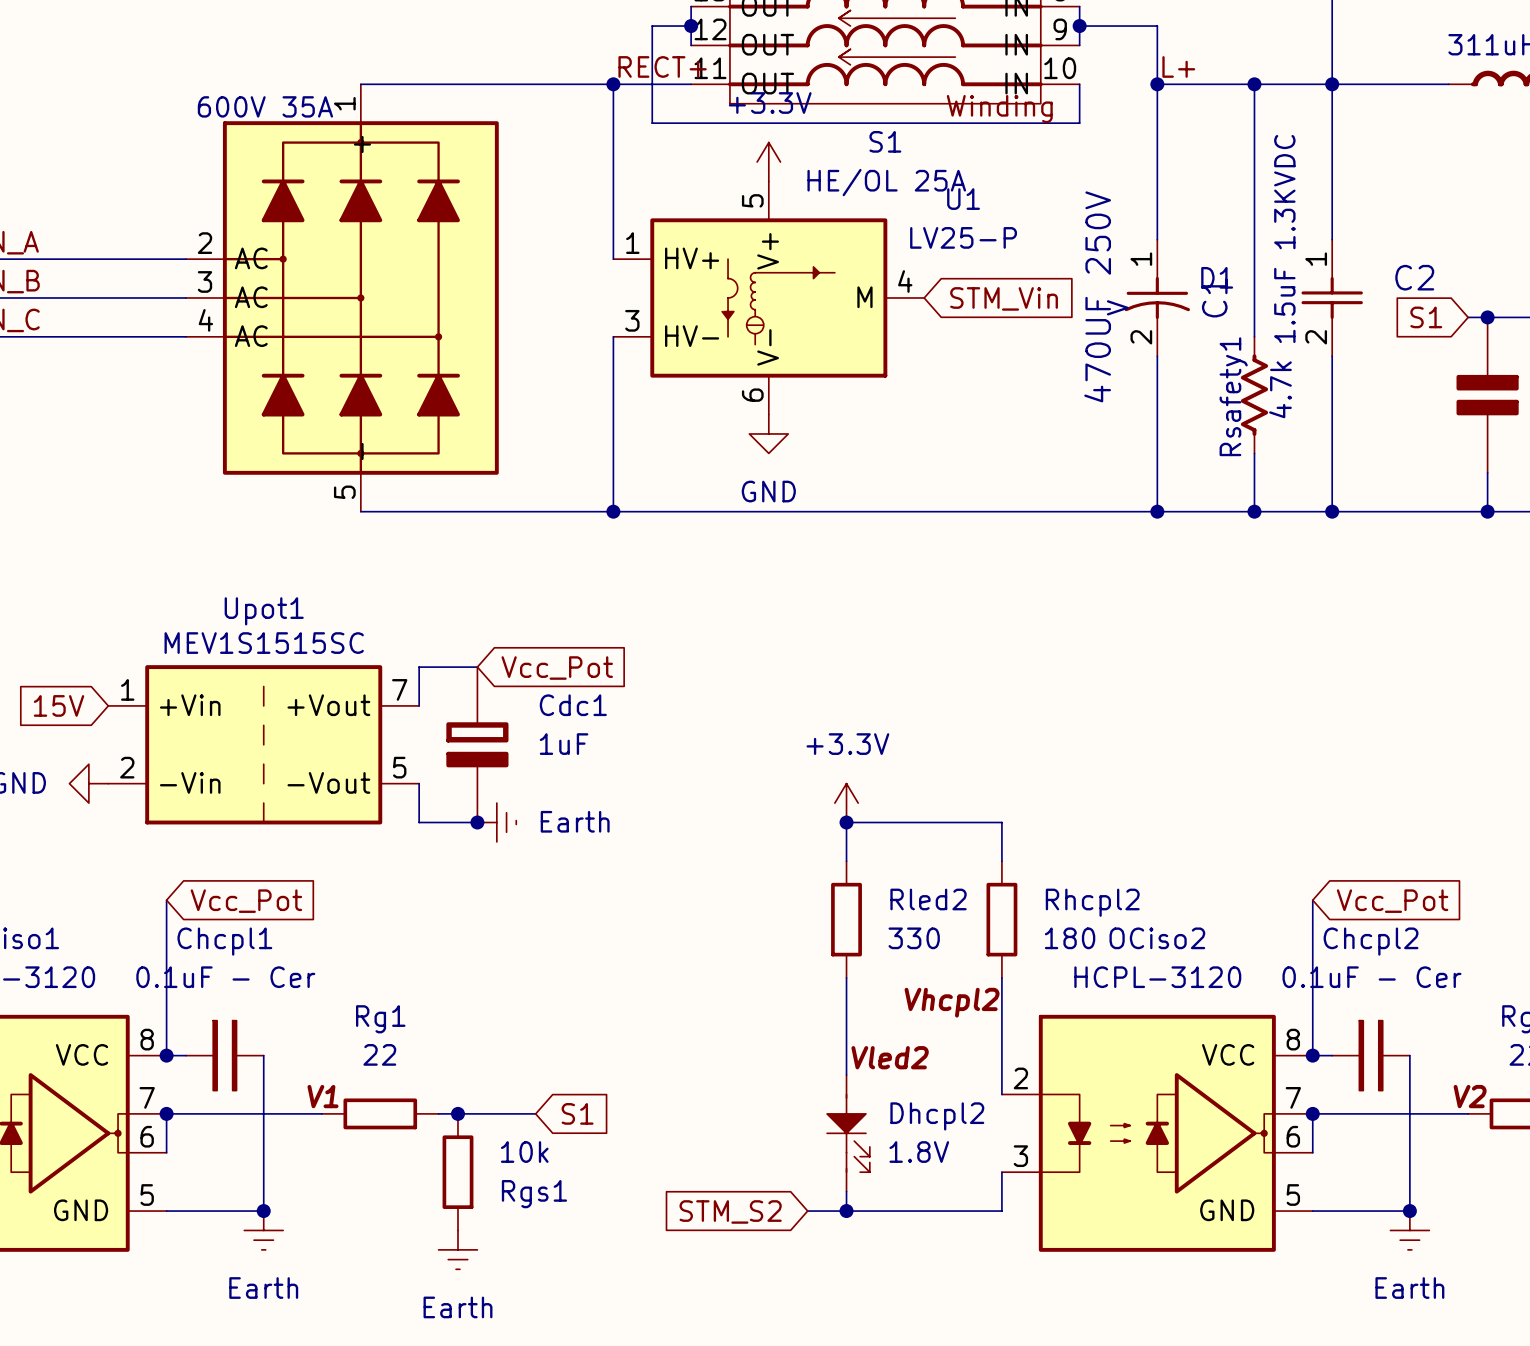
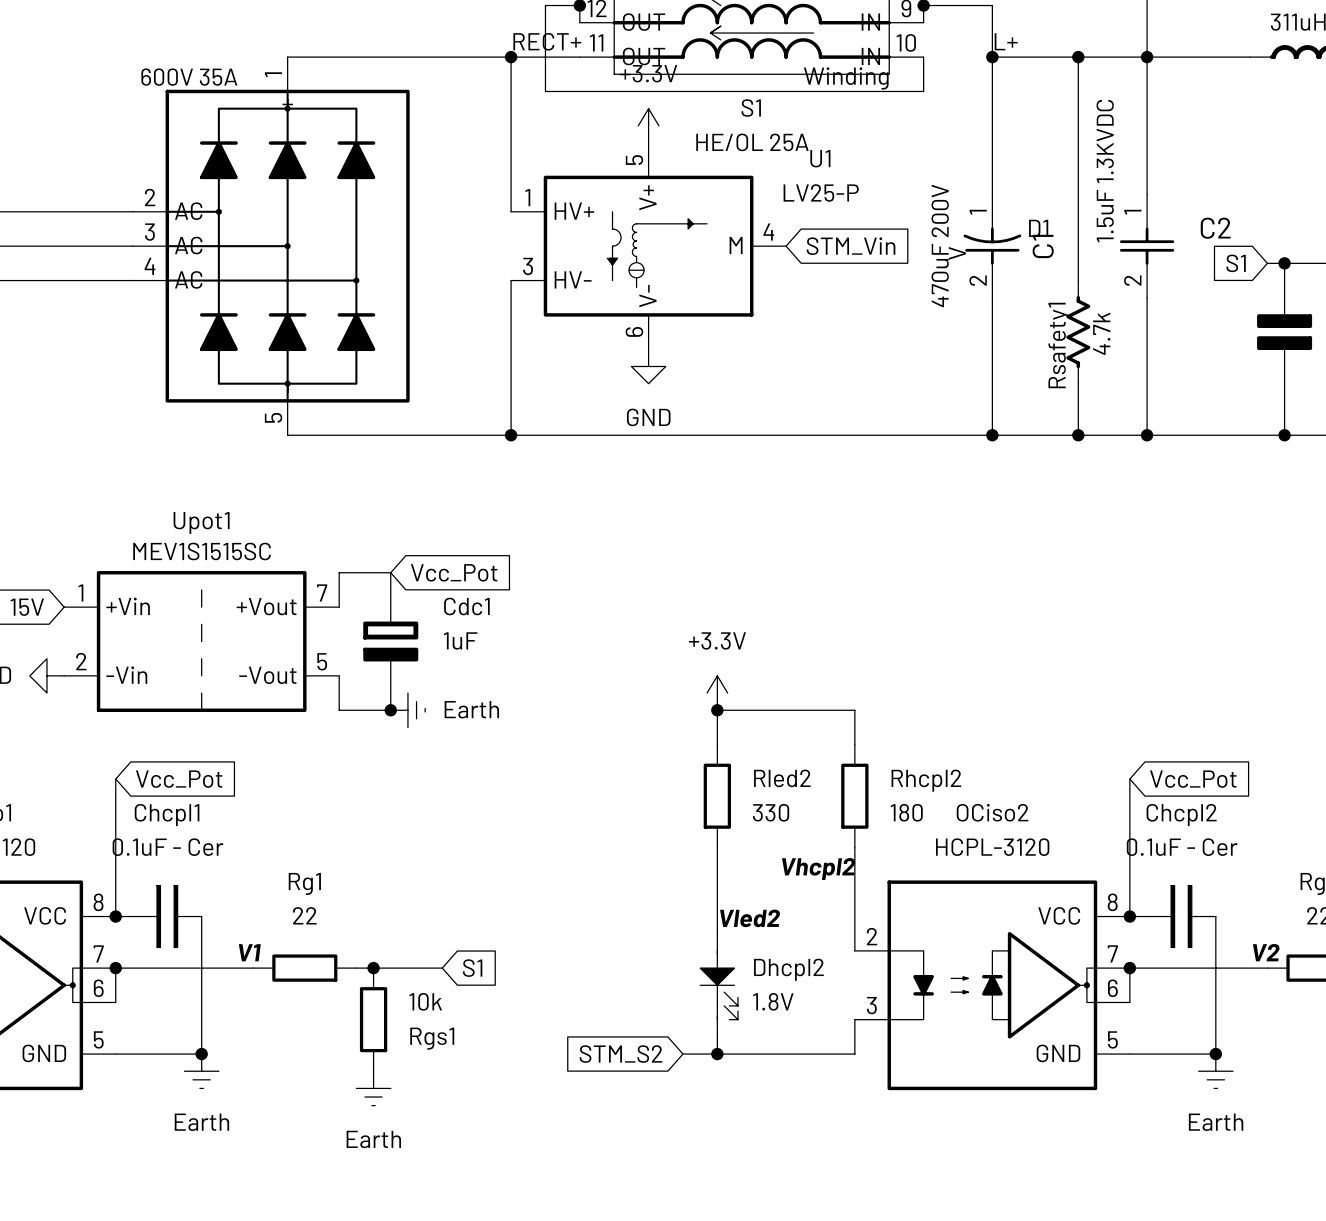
C1 symbol: [1124, 239, 1190, 357] -> [963, 194, 1022, 298]
C1 value: 470UF 250V (1097, 296) -> 470uF 200V (940, 245)

